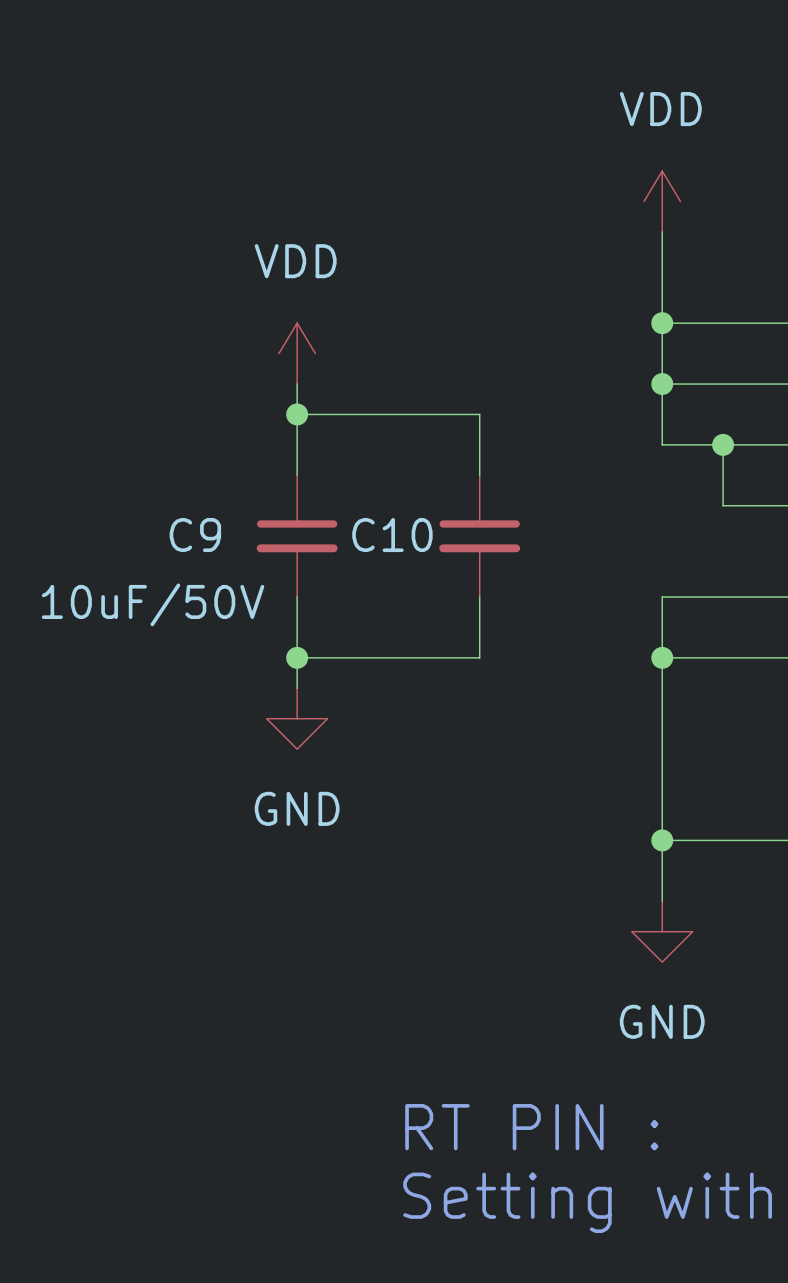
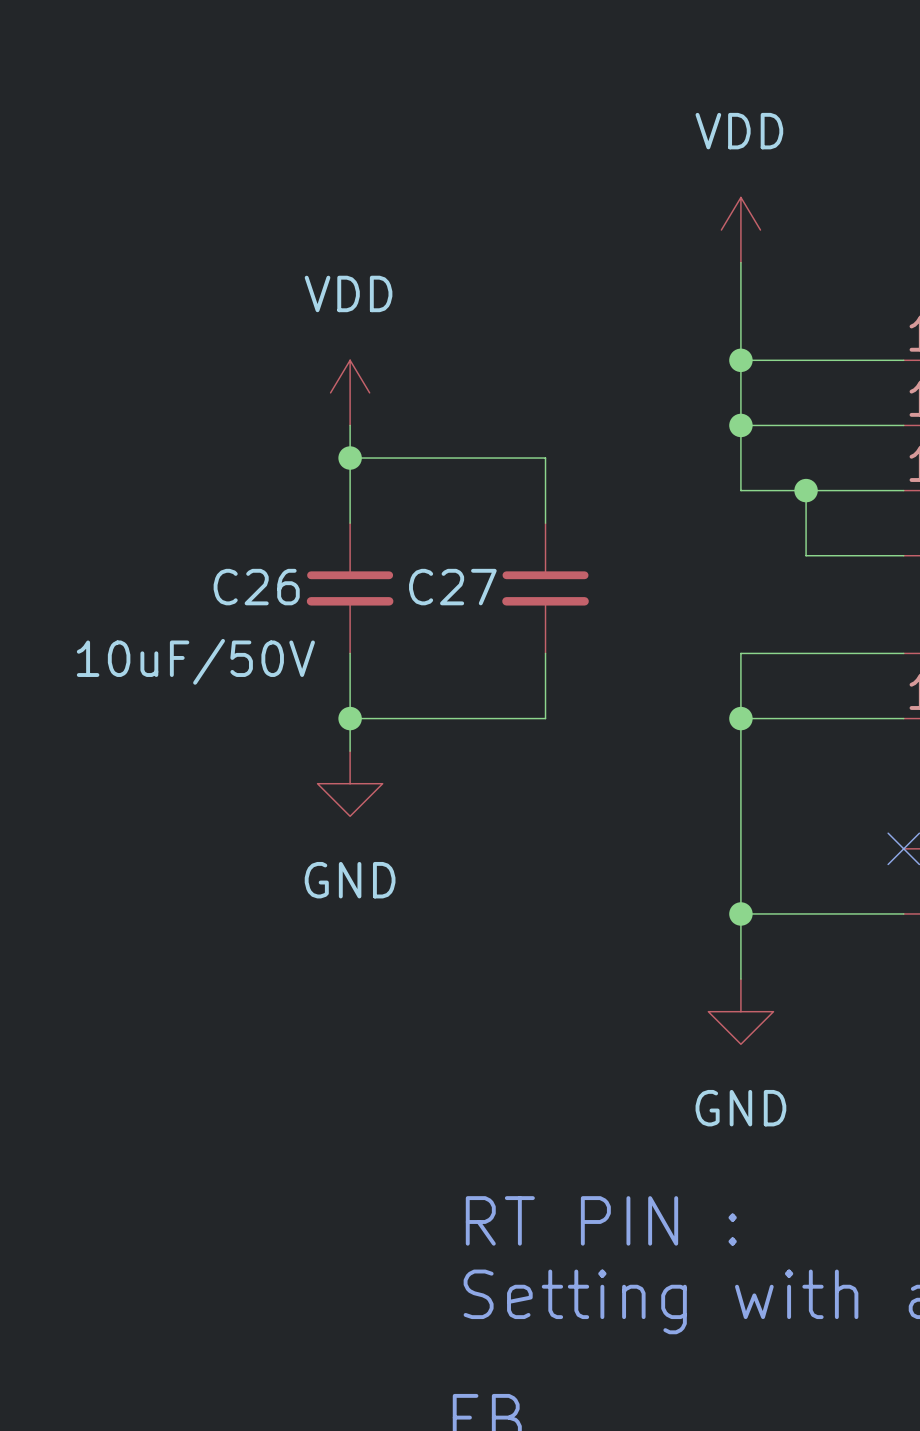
C9 name: C9 (195, 535) -> C26 (256, 587)
C10 name: C10 (392, 535) -> C27 (452, 587)

